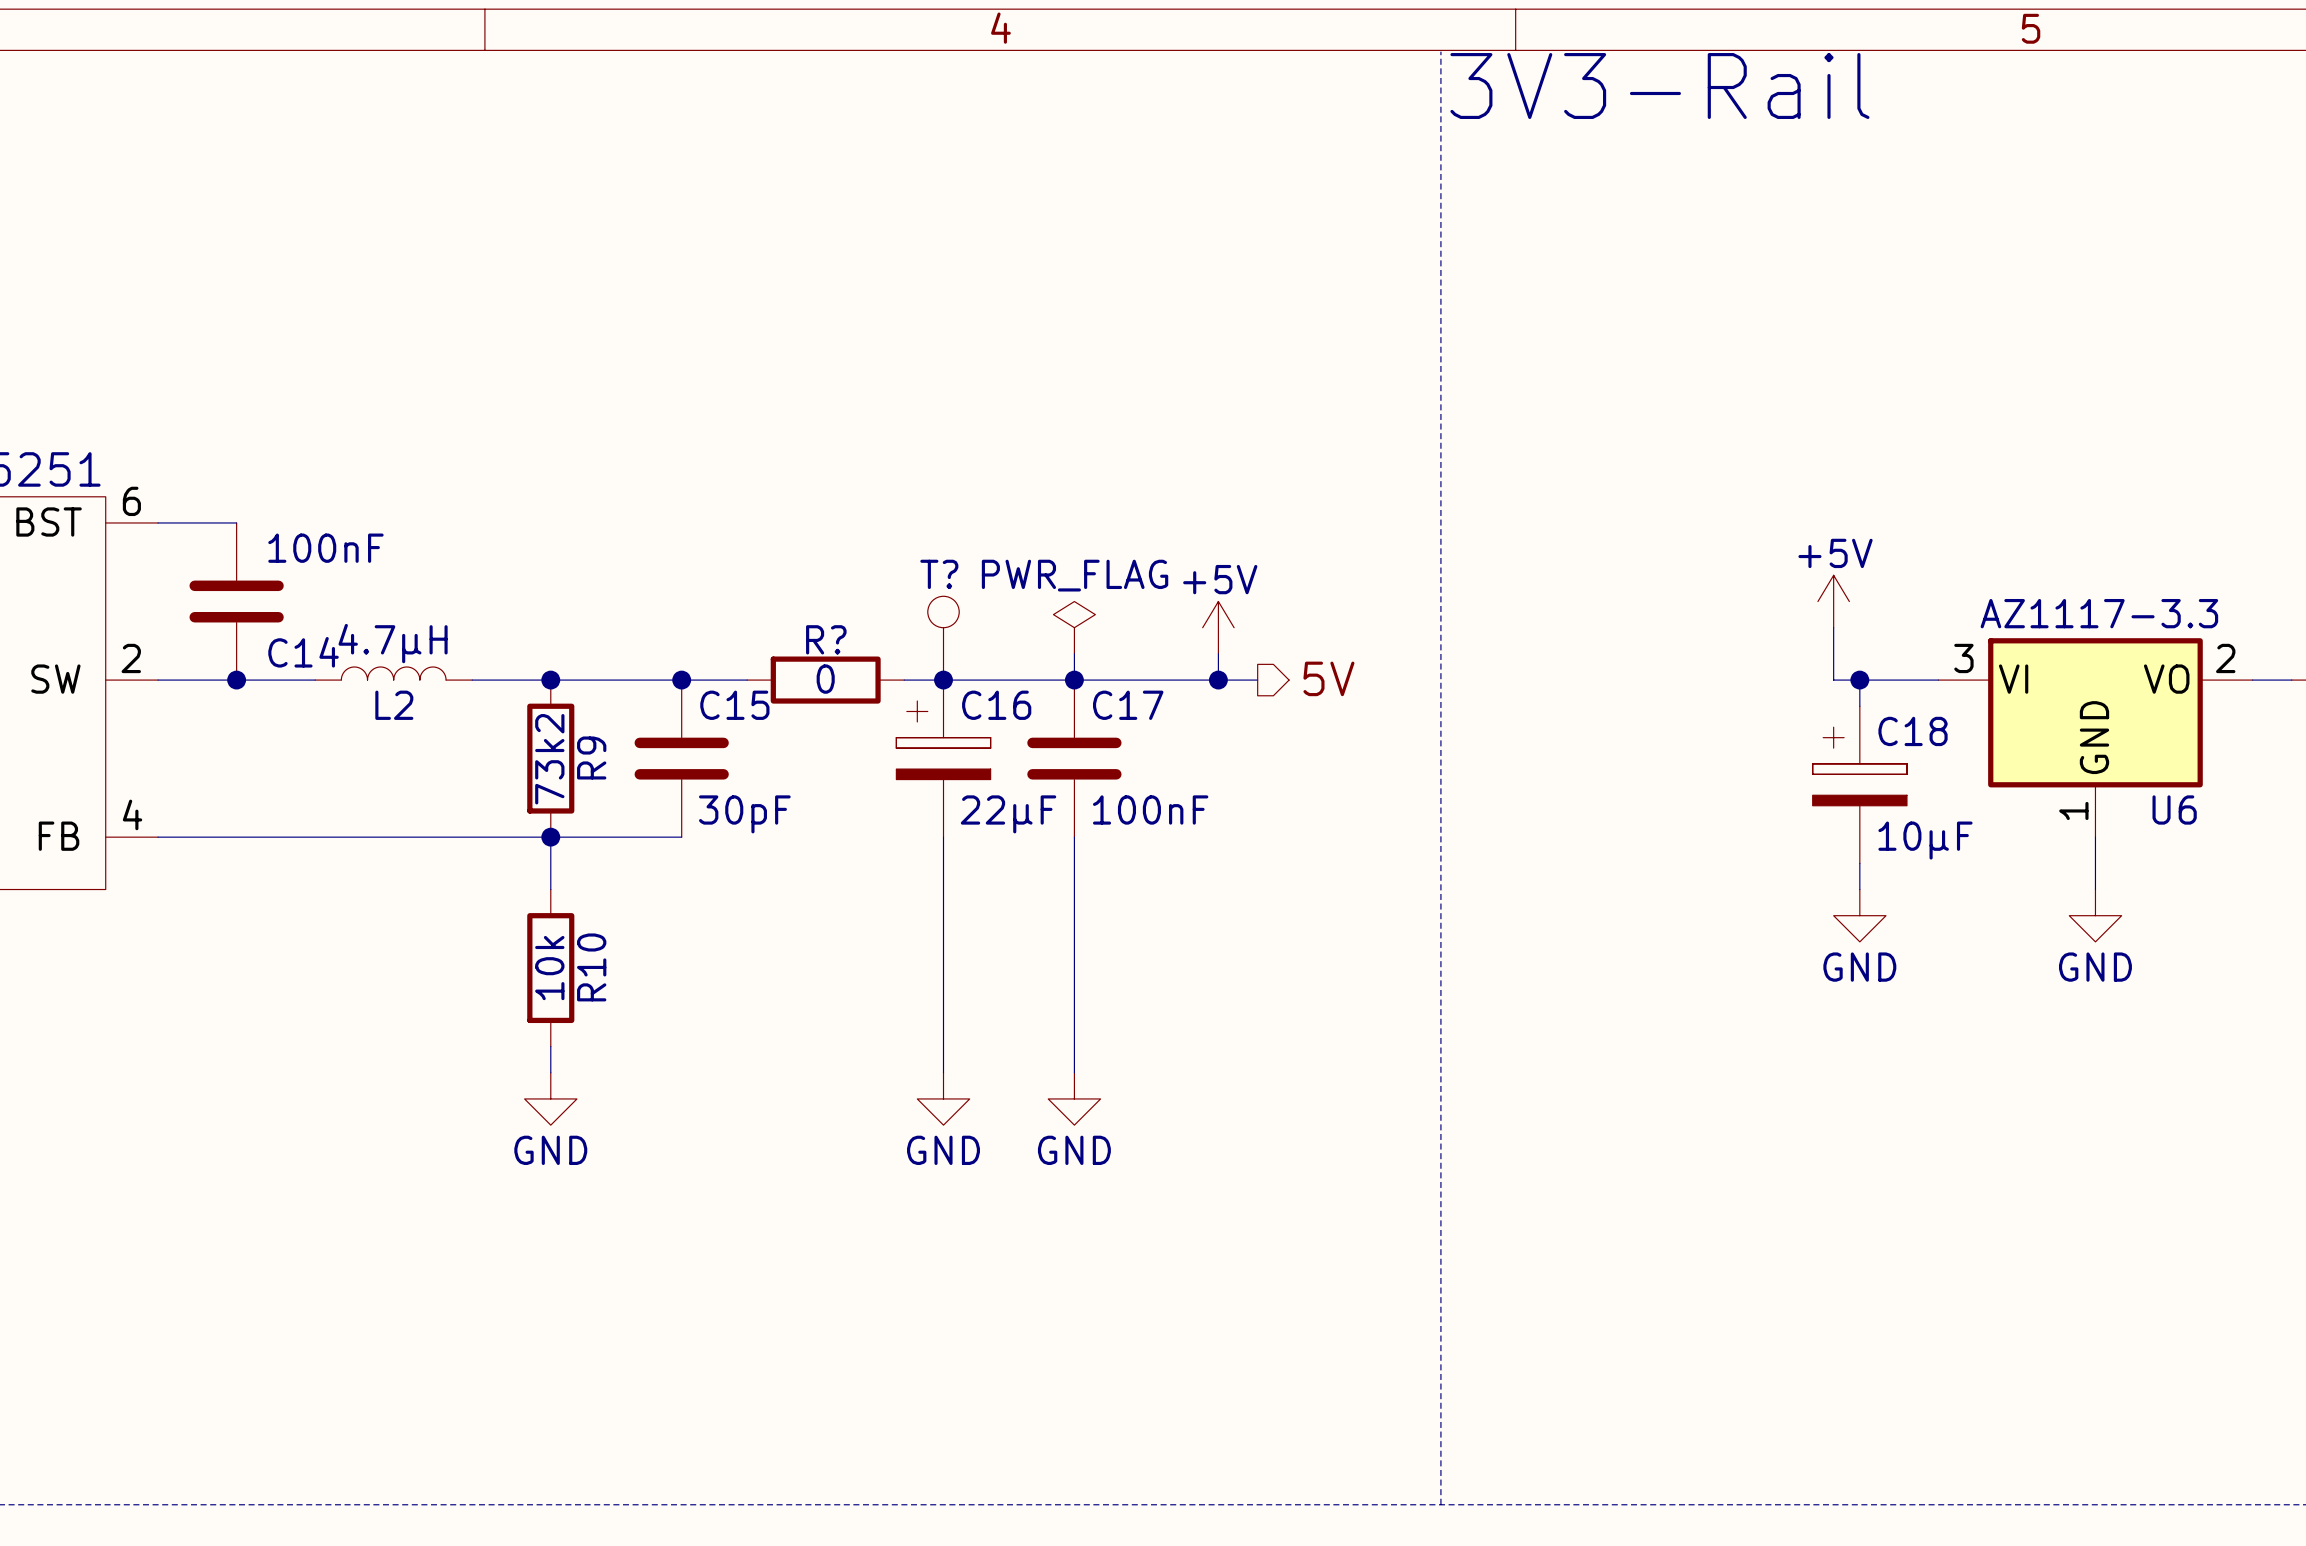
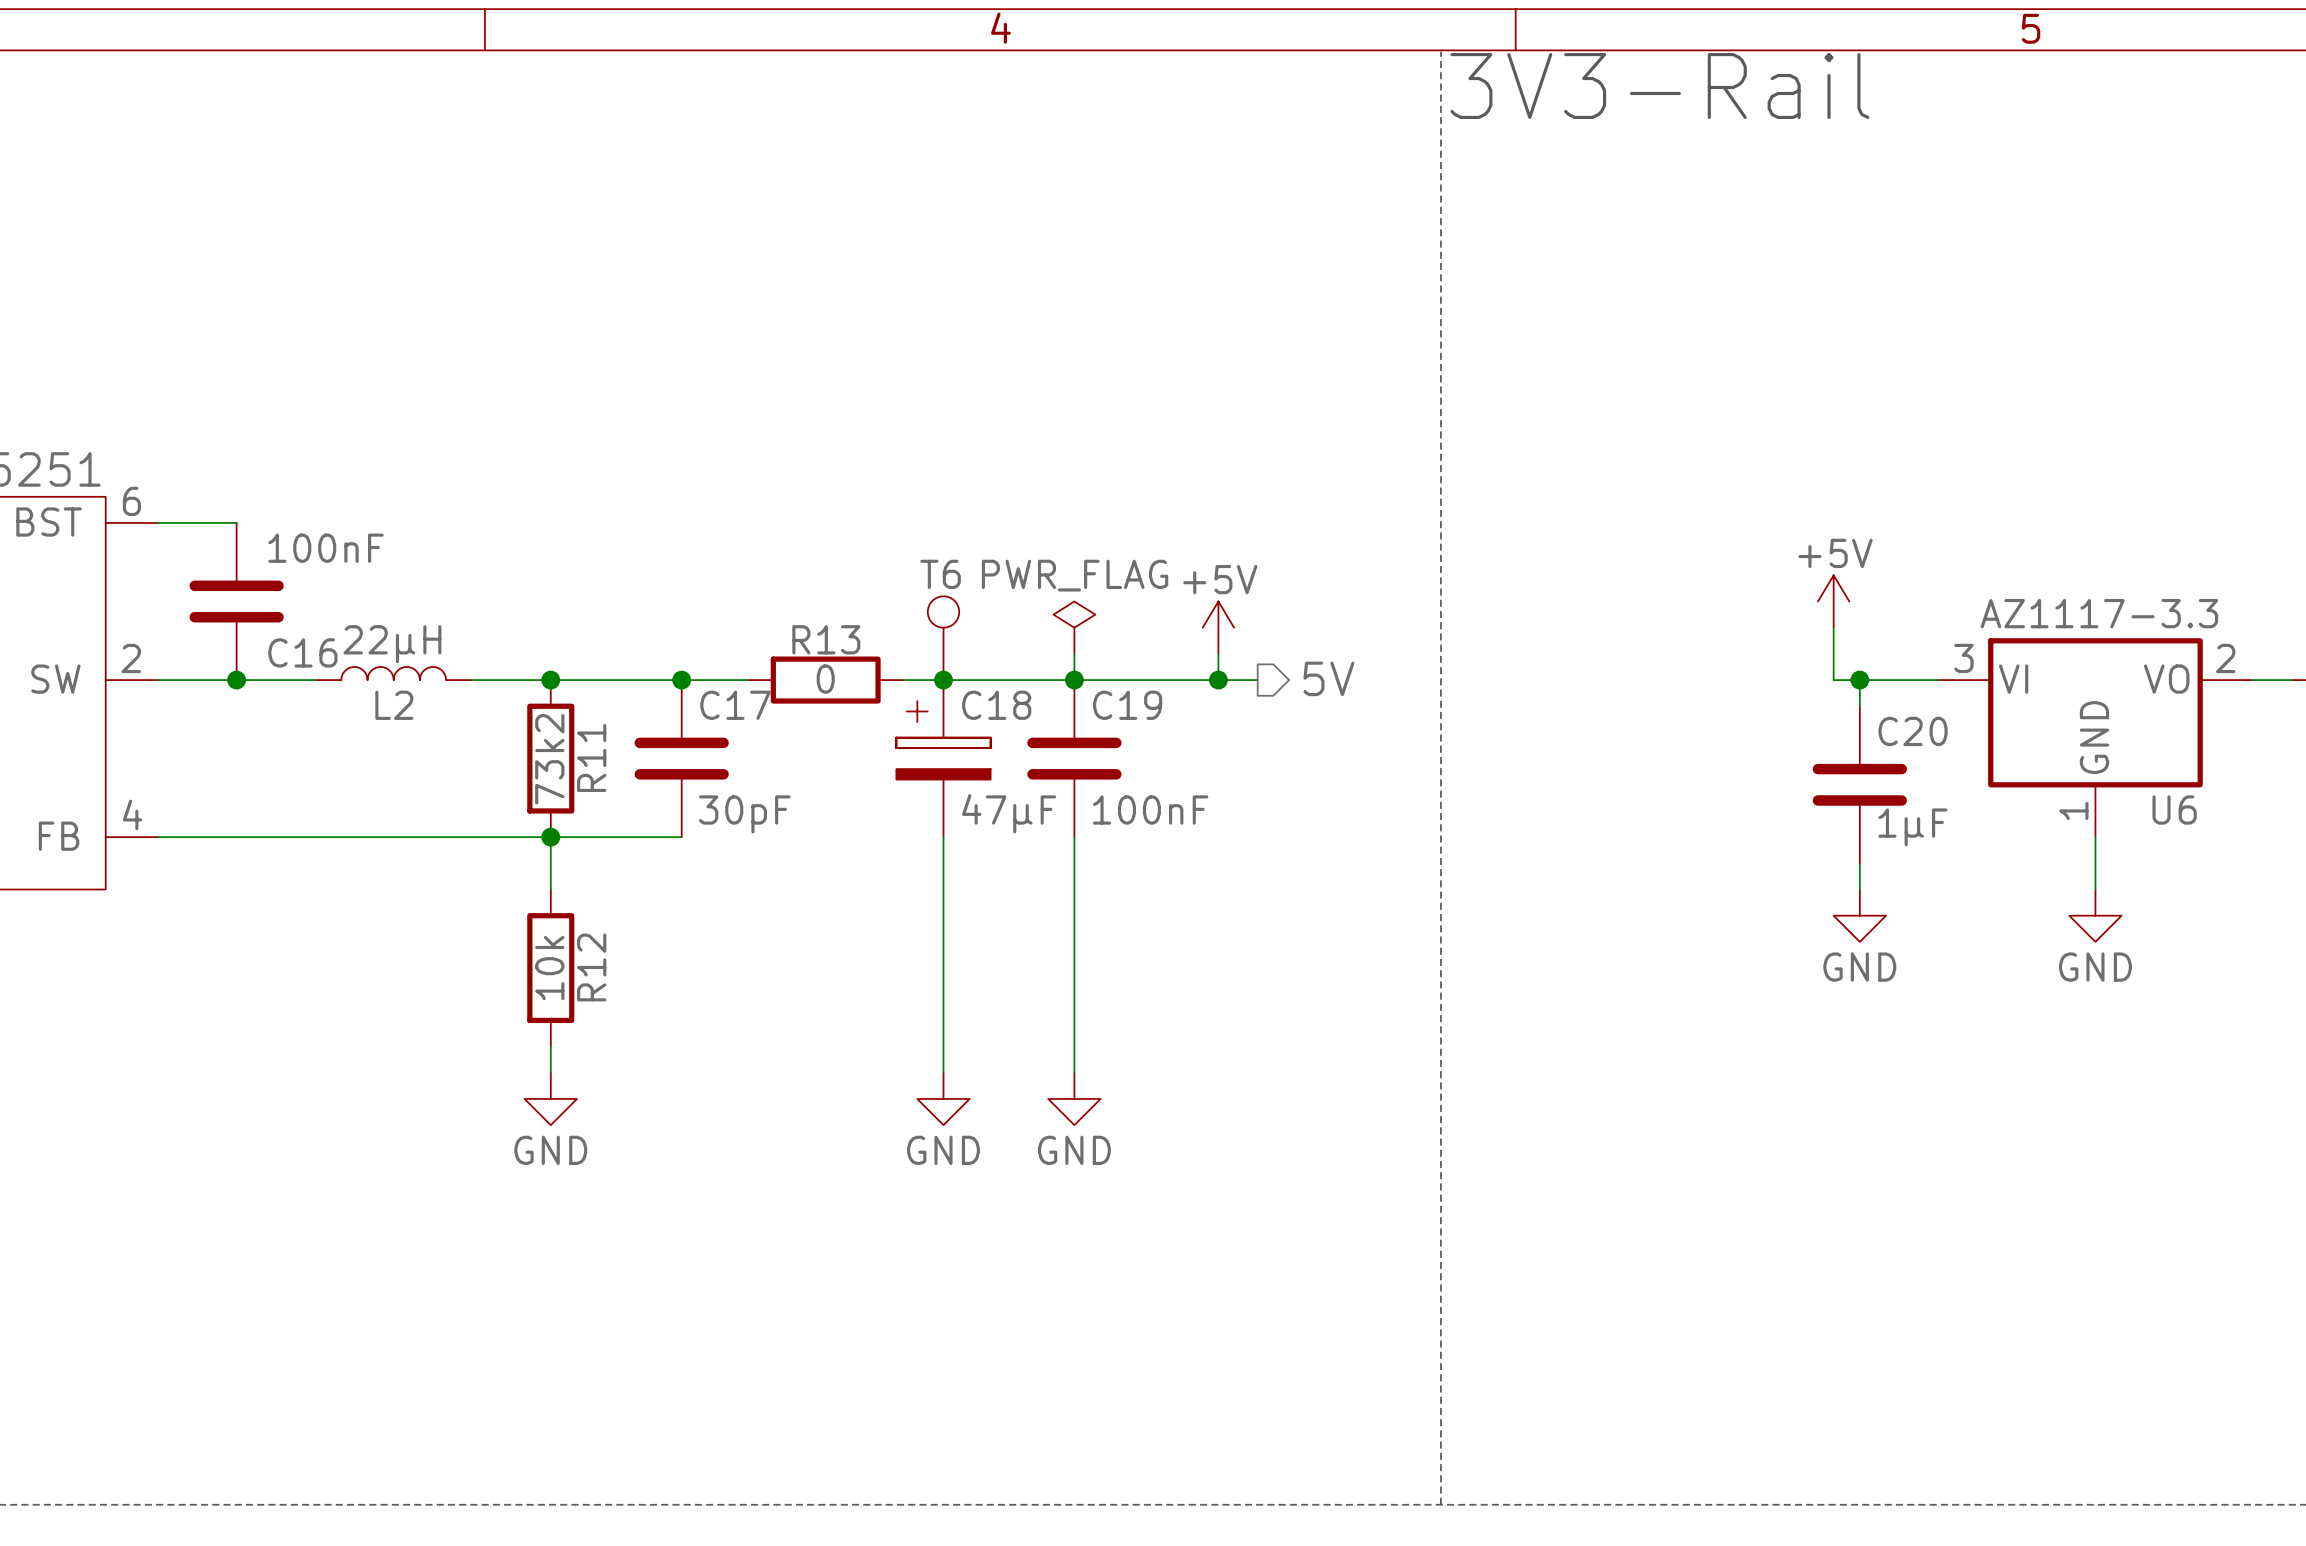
T? name: T? (939, 574) -> T6 (940, 574)
R? name: R? (826, 639) -> R13 (826, 639)
L2 value: 4.7μH (393, 643) -> 22μH (392, 644)
C14 name: C14 (303, 652) -> C16 (302, 652)
C15 name: C15 (734, 705) -> C17 (735, 705)
C16 name: C16 (996, 705) -> C18 (996, 705)
C17 name: C17 (1128, 705) -> C19 (1127, 705)
R9 name: R9 (591, 757) -> R11 (591, 757)
C18: 10μF (1859, 784) -> none
C20: none -> 1μF (1859, 784)
C16 value: 22μF (1008, 814) -> 47μF (1009, 813)
R10 name: R10 (591, 967) -> R12 (591, 967)

